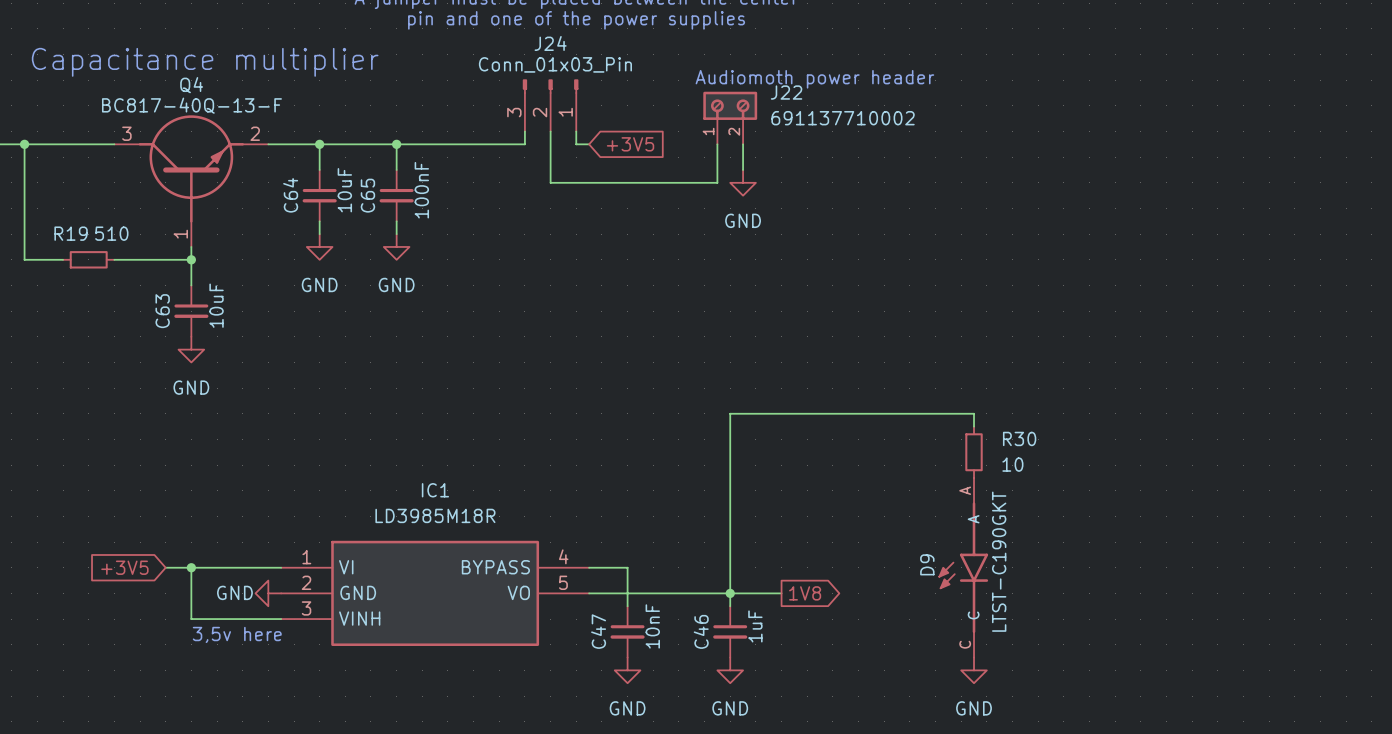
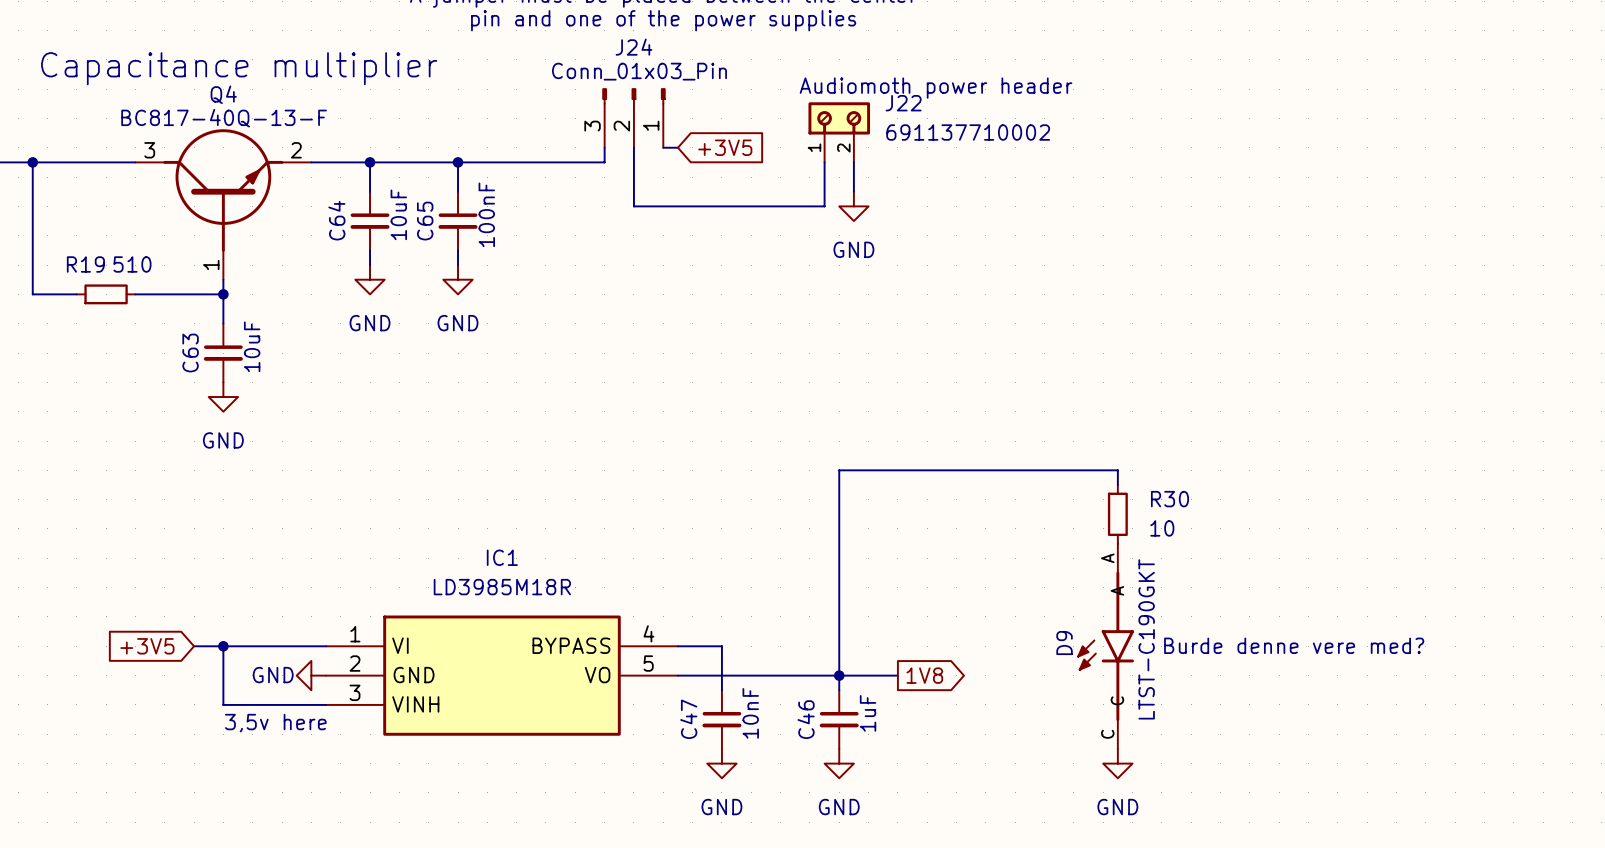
wire: (576, 131) (576, 144) (589, 144) -> (663, 147) (677, 147)
global label position: +3V5 (630, 144) -> +3V5 (725, 147)
text: none -> Burde denne vere med? (1294, 645)

